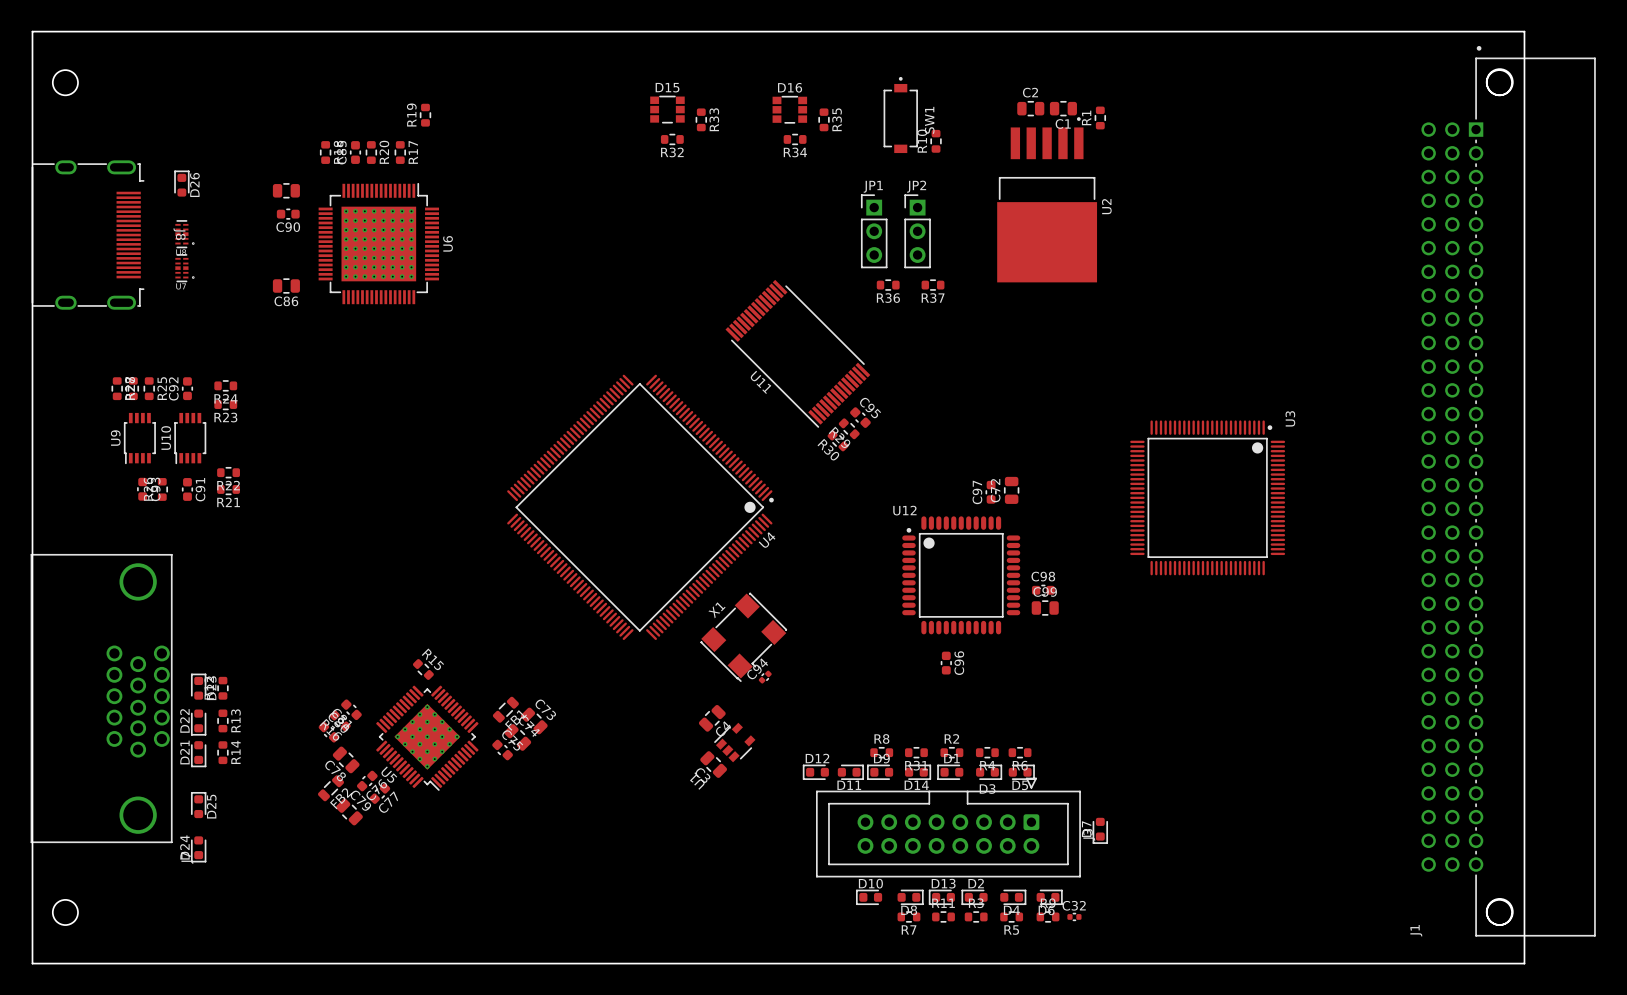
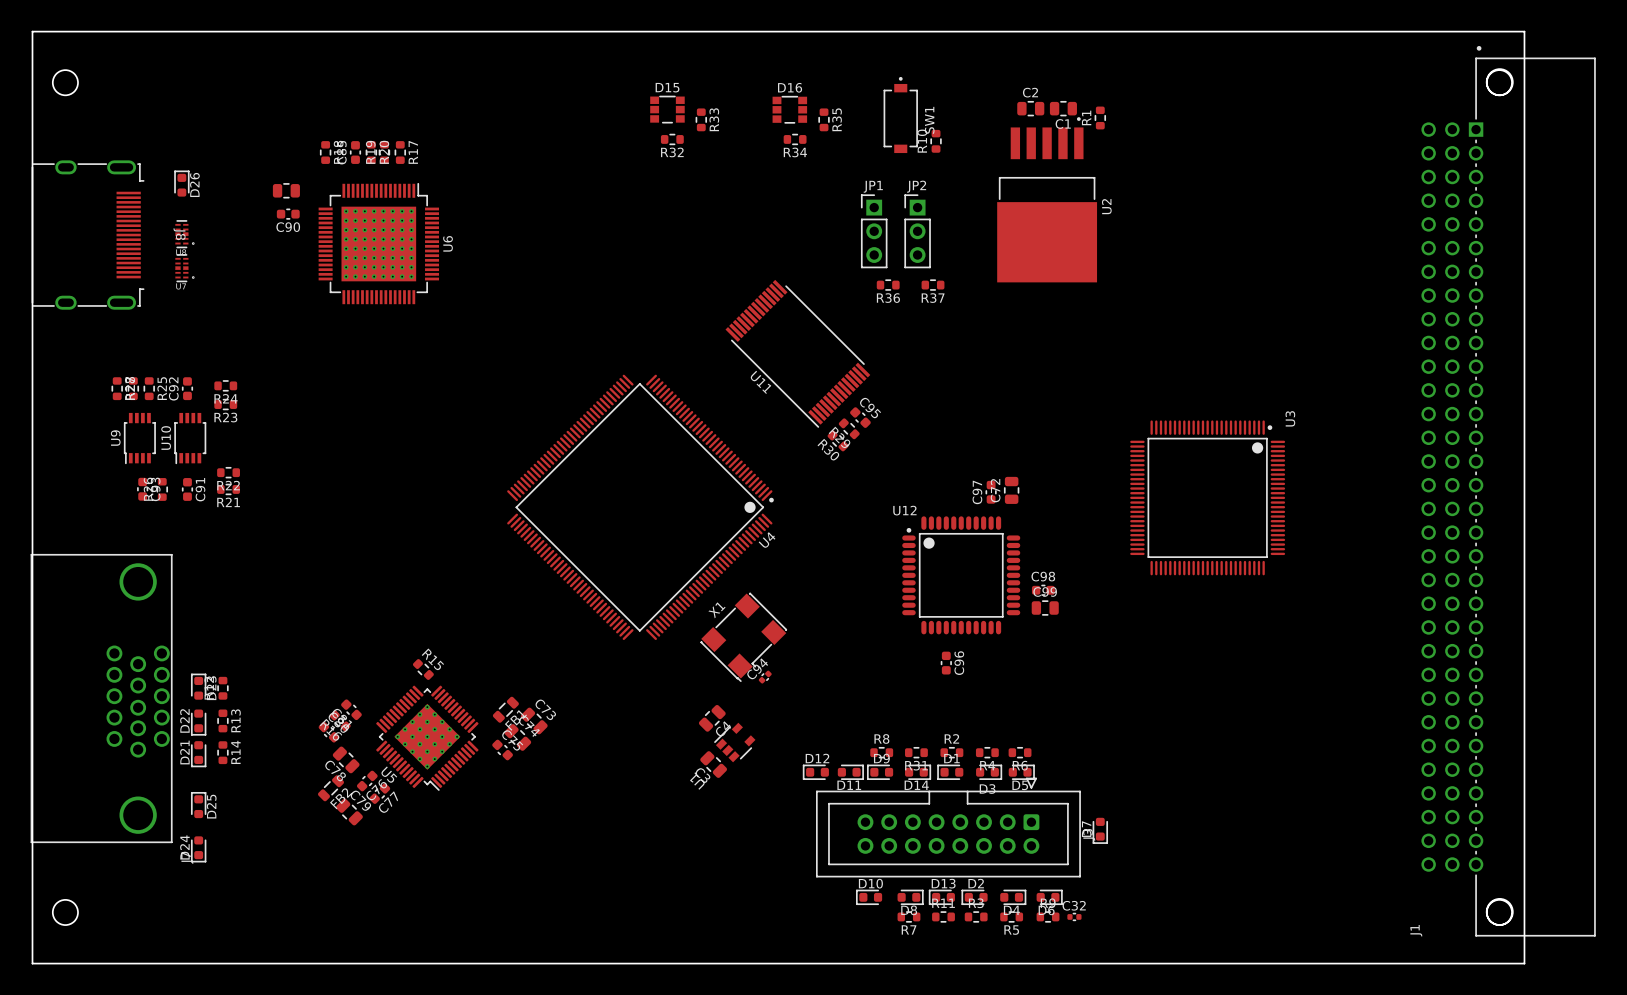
R19 position: (425, 115) -> (384, 152)
C86: (286, 285) -> none

